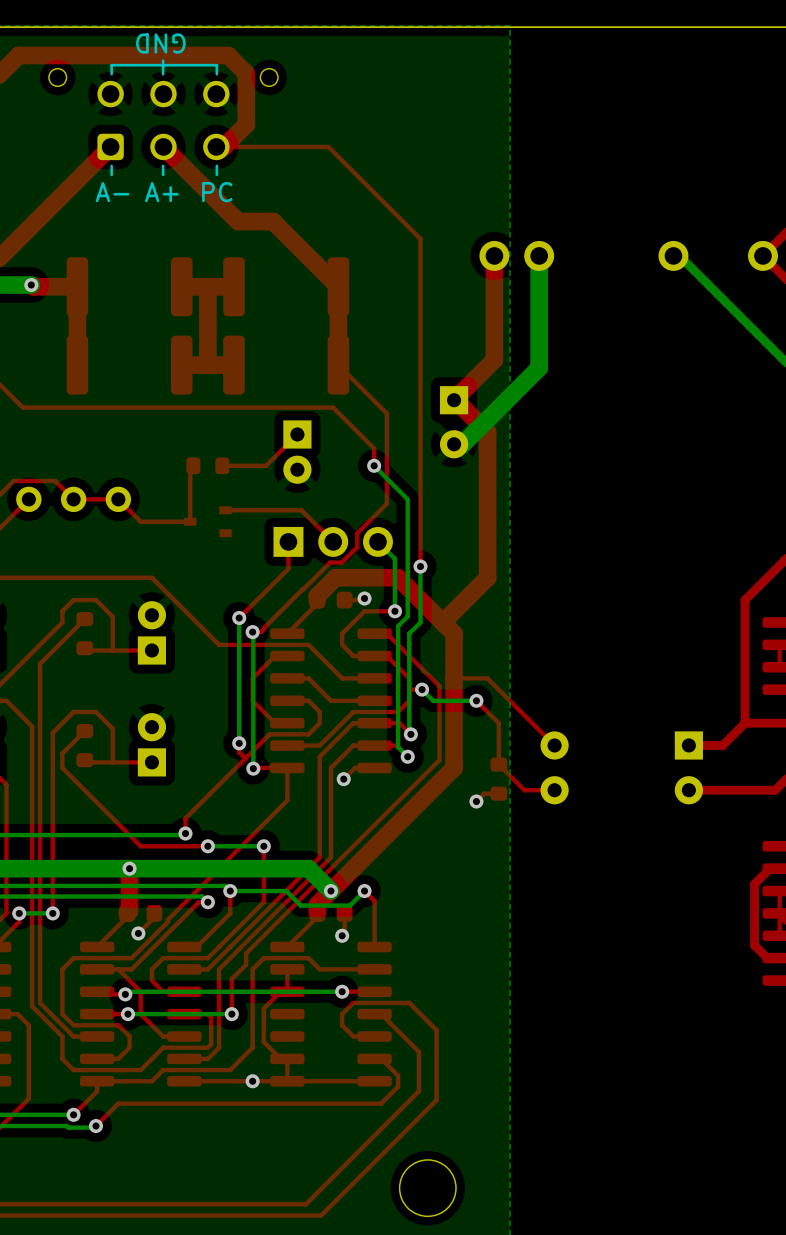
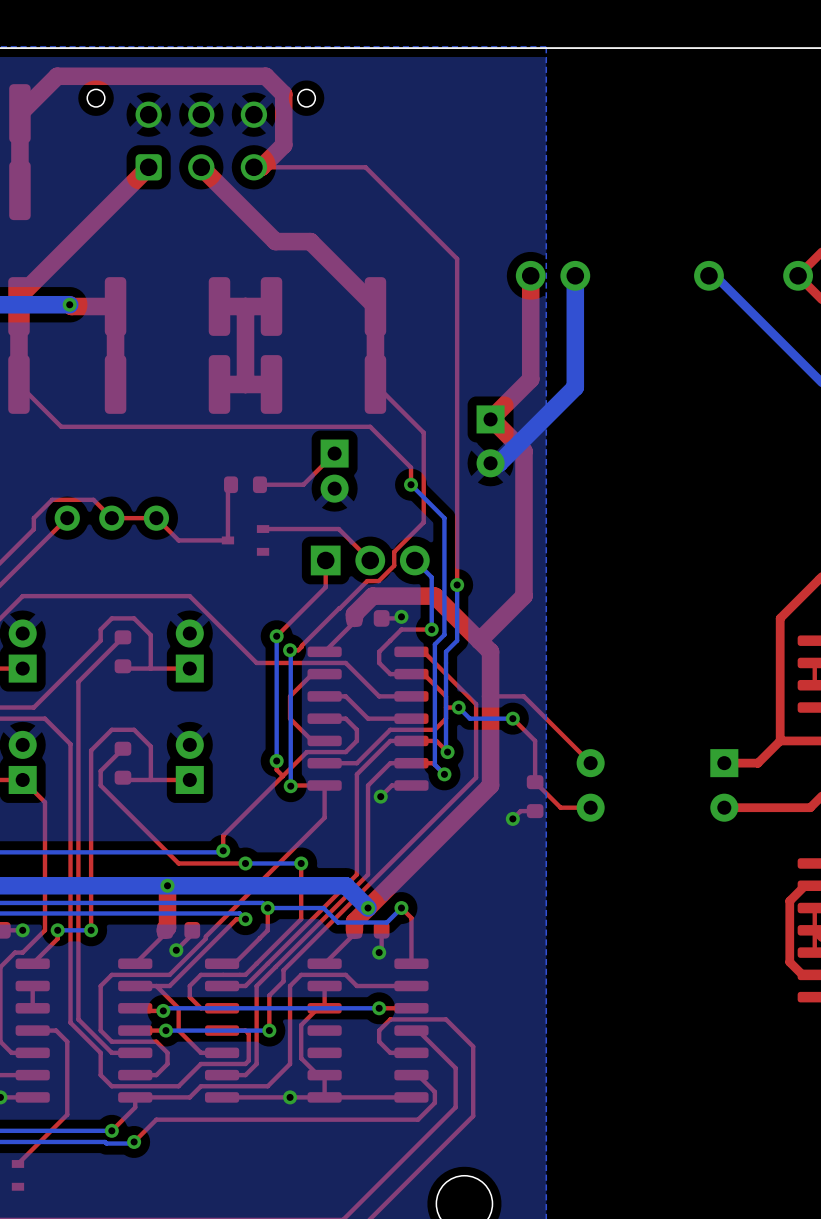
text: GND (160, 43) -> none
line: (163, 60) (163, 74) -> none
line: (216, 74) (216, 65) (111, 65) (111, 74) -> none
line: (111, 165) (111, 174) -> none
line: (163, 165) (163, 174) -> none
line: (216, 165) (216, 174) -> none
text: A- (112, 192) -> none
text: A+ (161, 192) -> none
text: PC (217, 192) -> none

